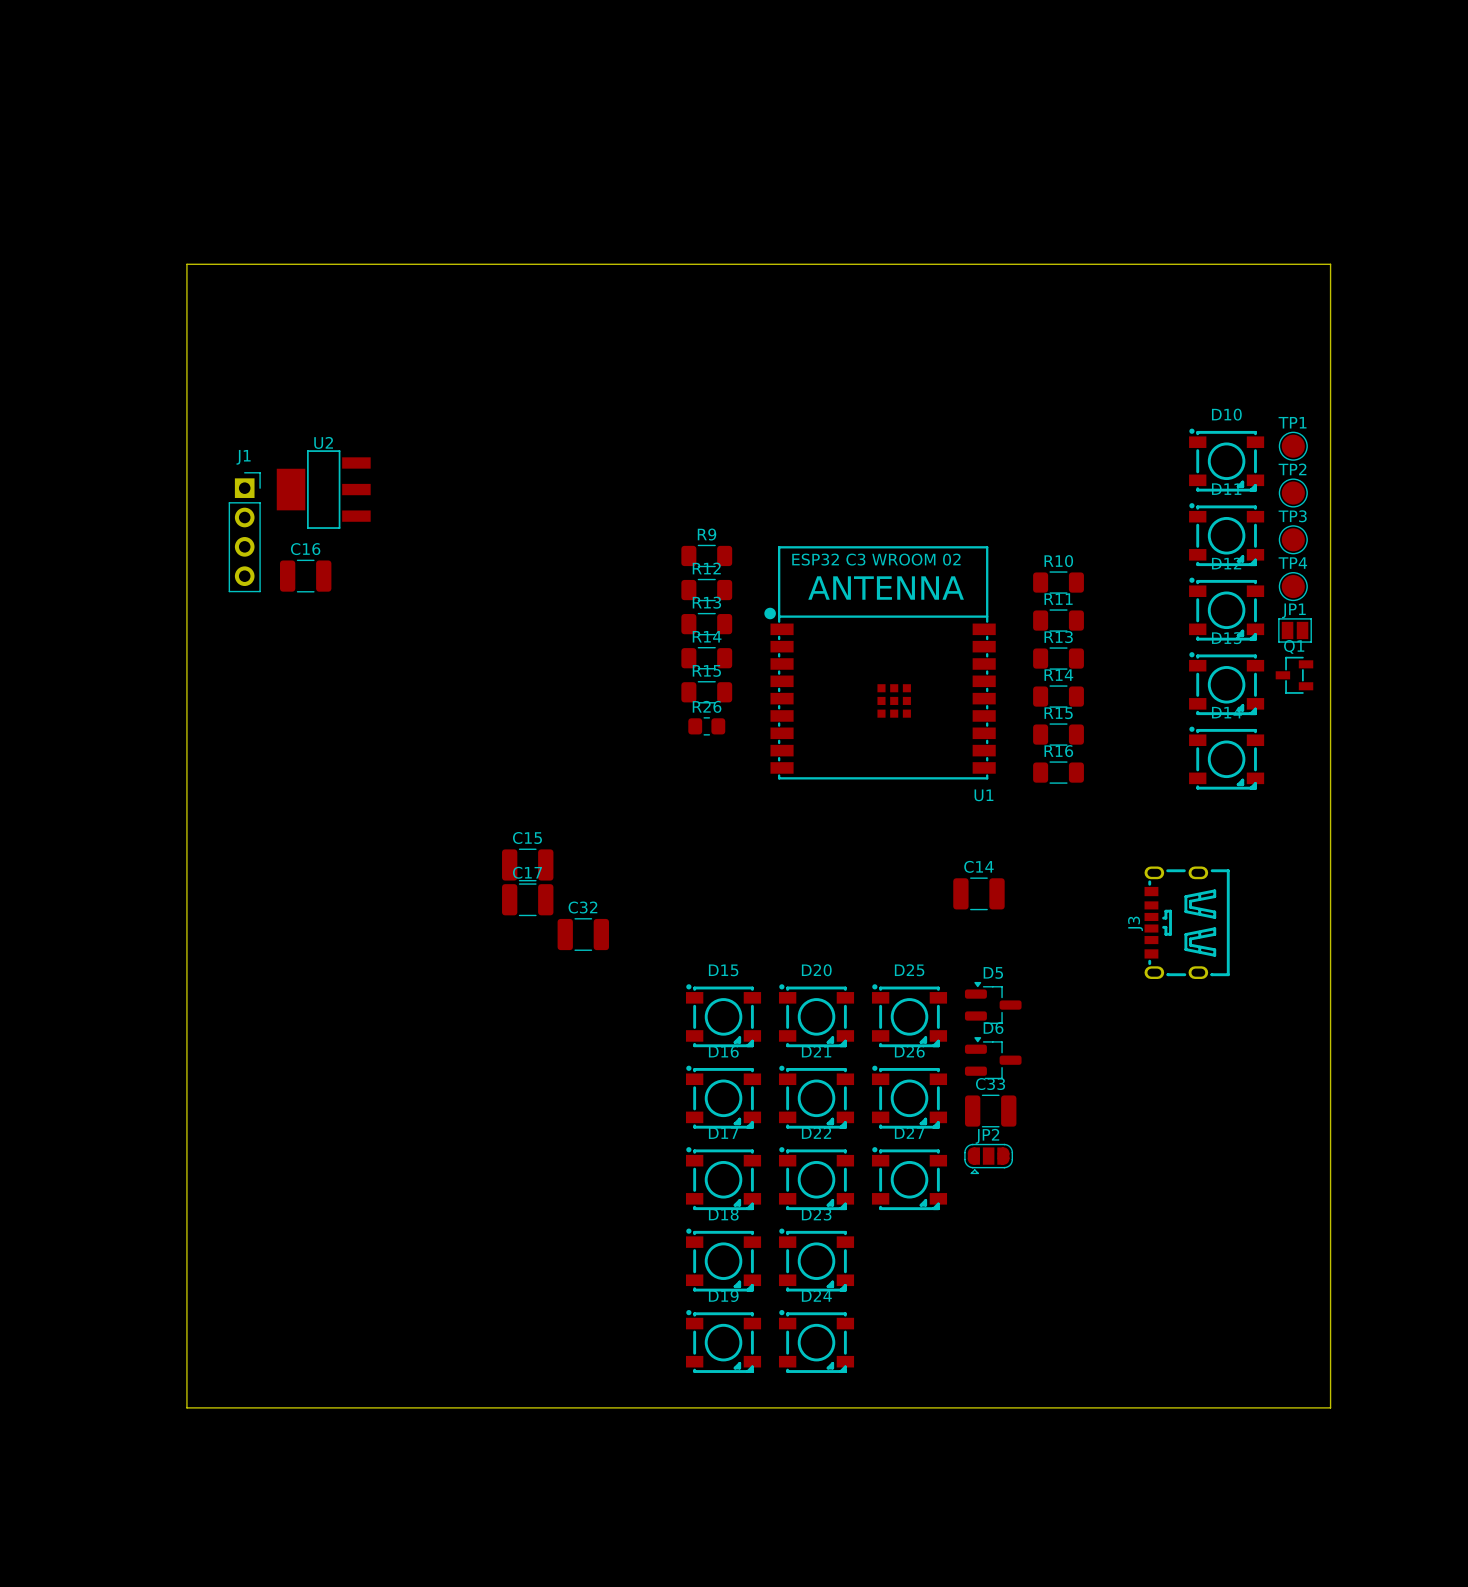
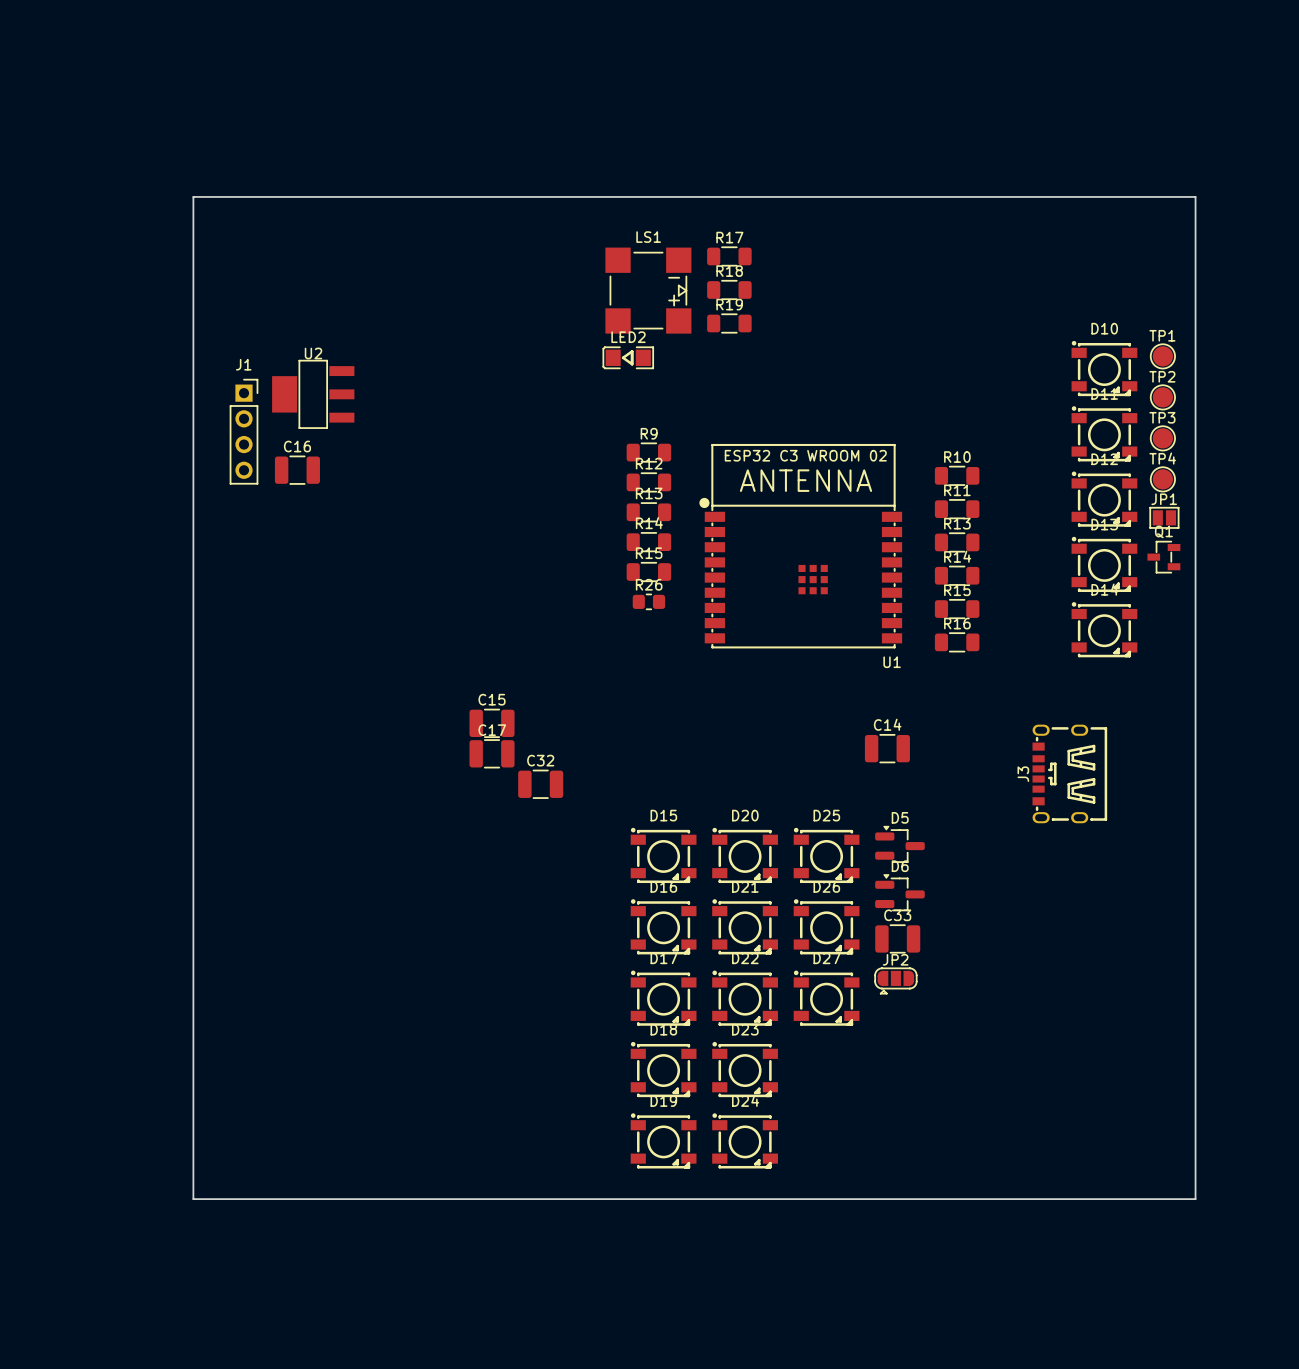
R17: none -> (729, 256)
R18: none -> (729, 289)
LS1: none -> (648, 290)
R19: none -> (729, 323)
LED2: none -> (628, 357)

